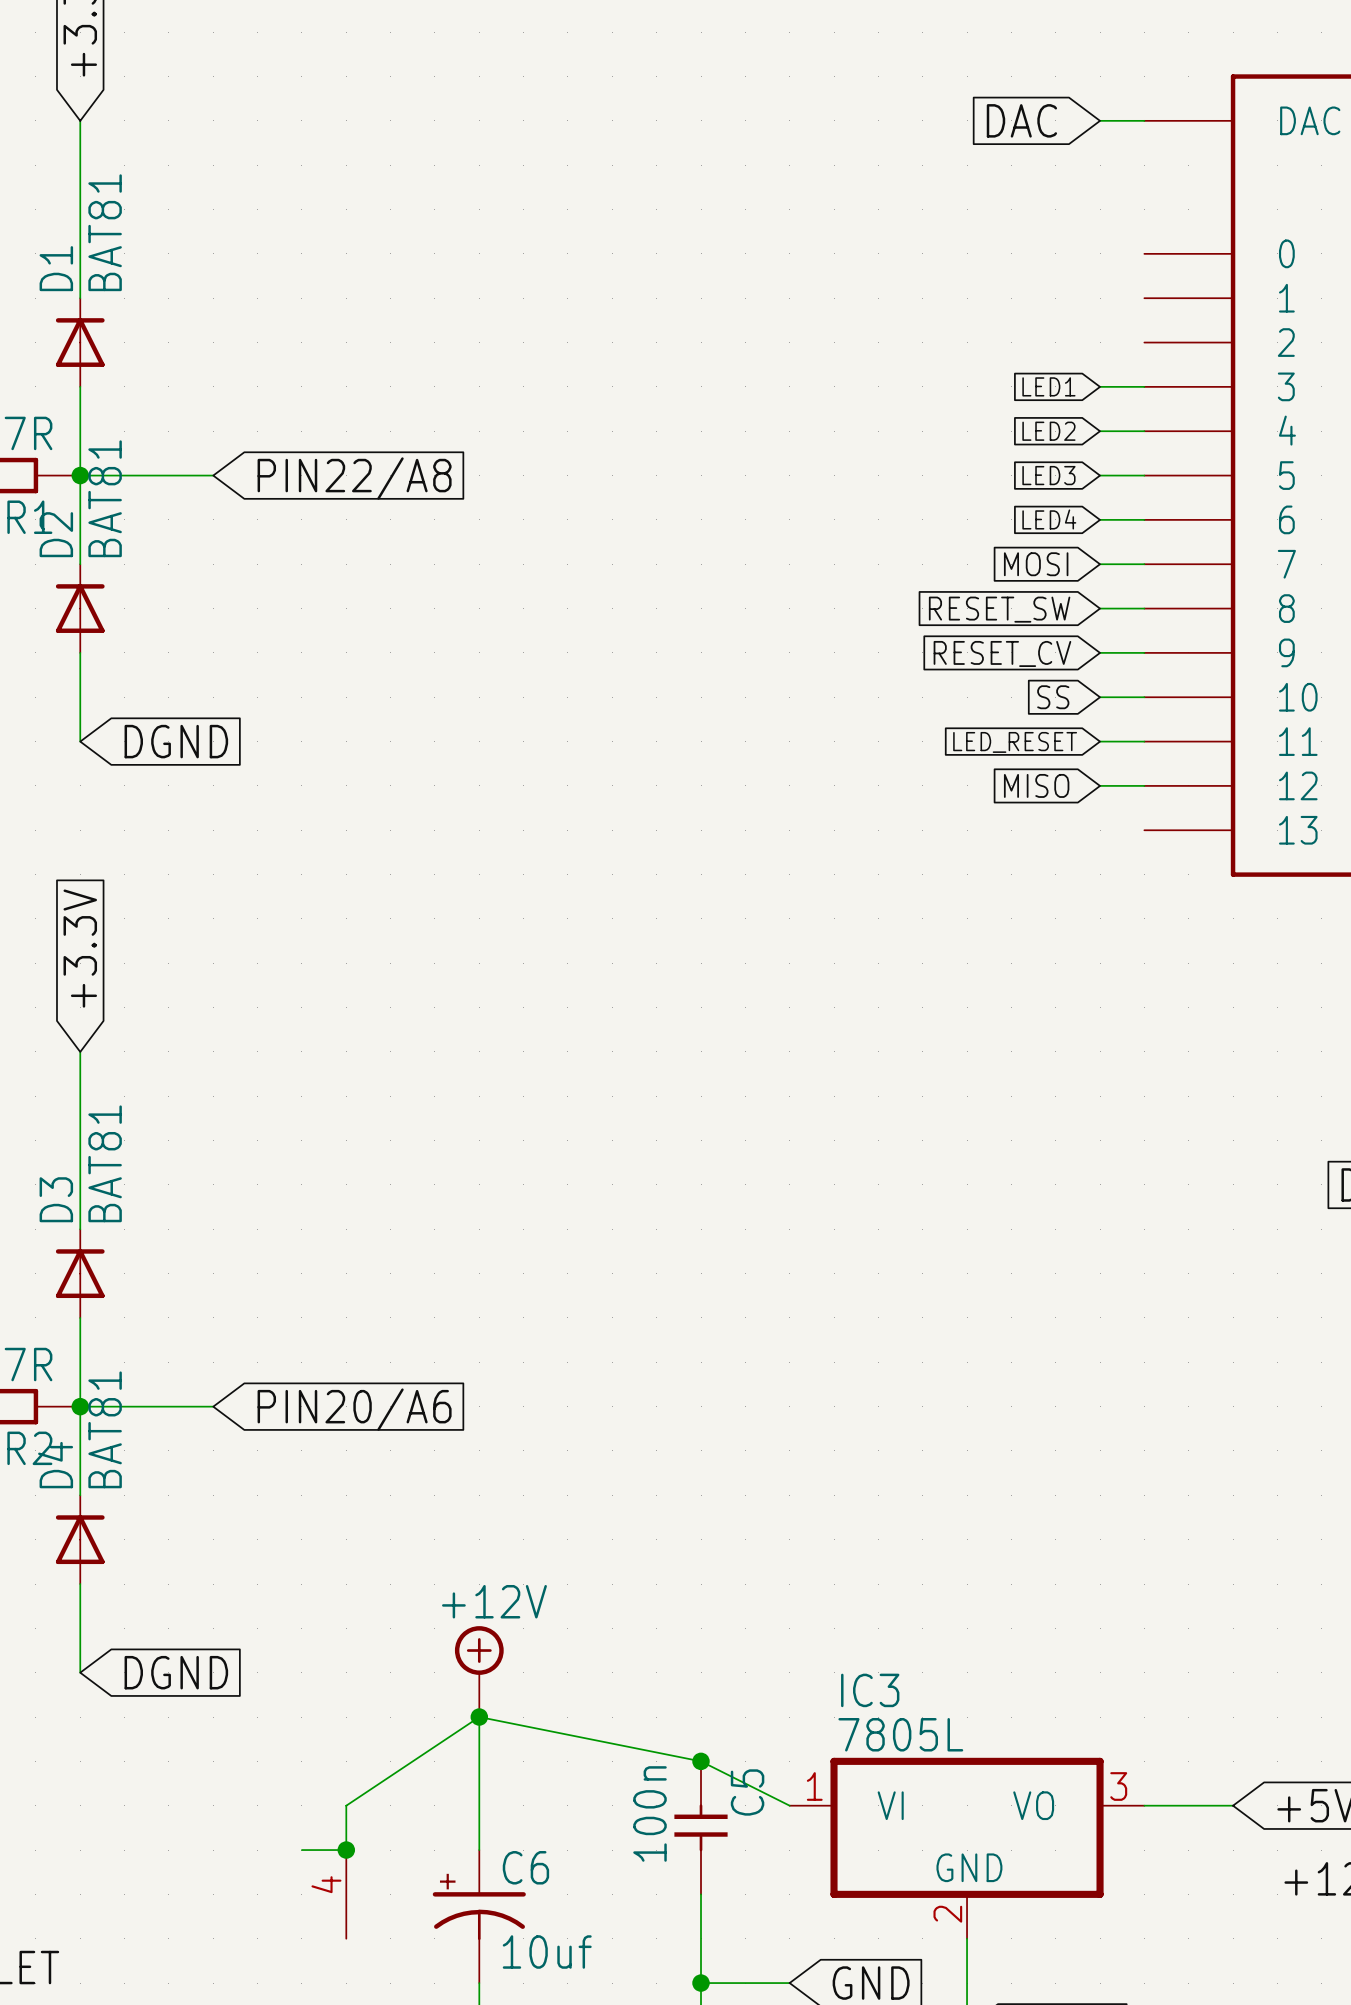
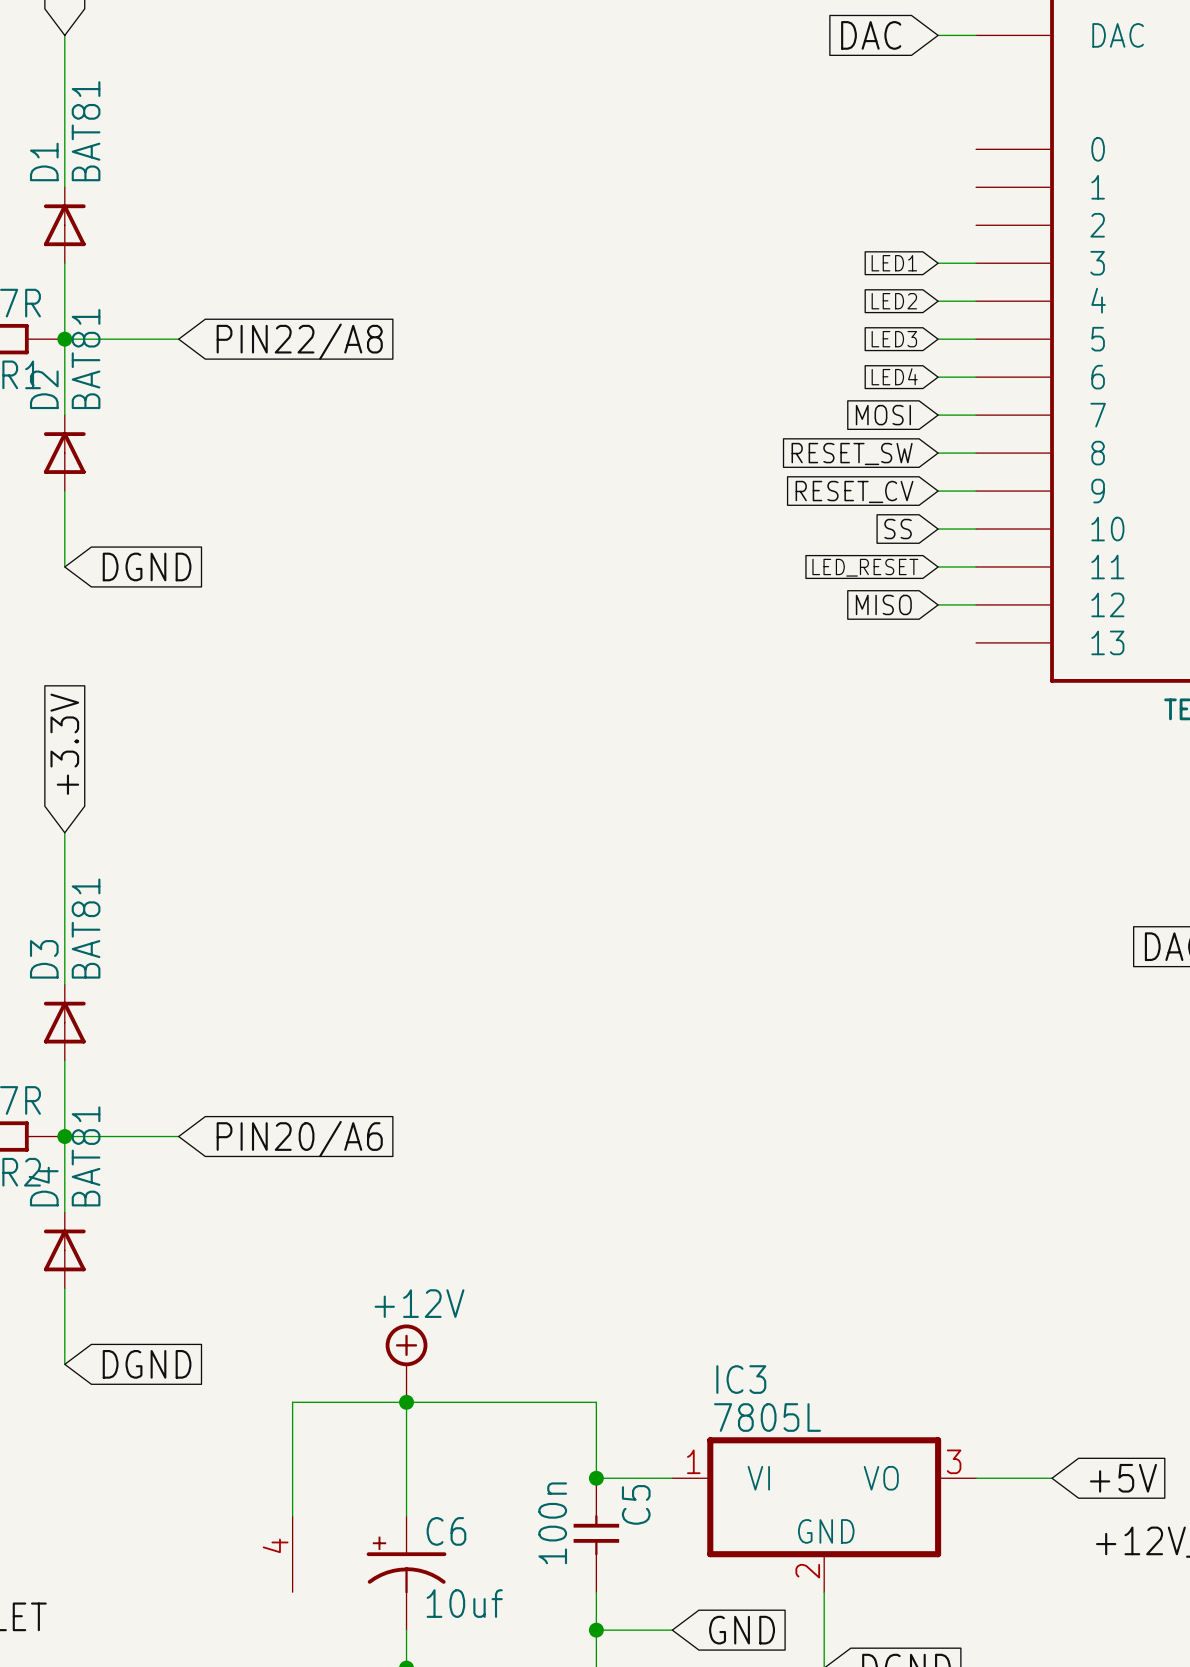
junction position: (701, 1761) -> (596, 1478)
wire: (346, 1805) (479, 1717) (701, 1761) (789, 1805) -> (292, 1478) (292, 1402) (596, 1402) (596, 1478) (672, 1478)
C5 position: (701, 1827) -> (596, 1535)
wire: (301, 1850) (346, 1850) -> none
junction: (346, 1850) -> none

